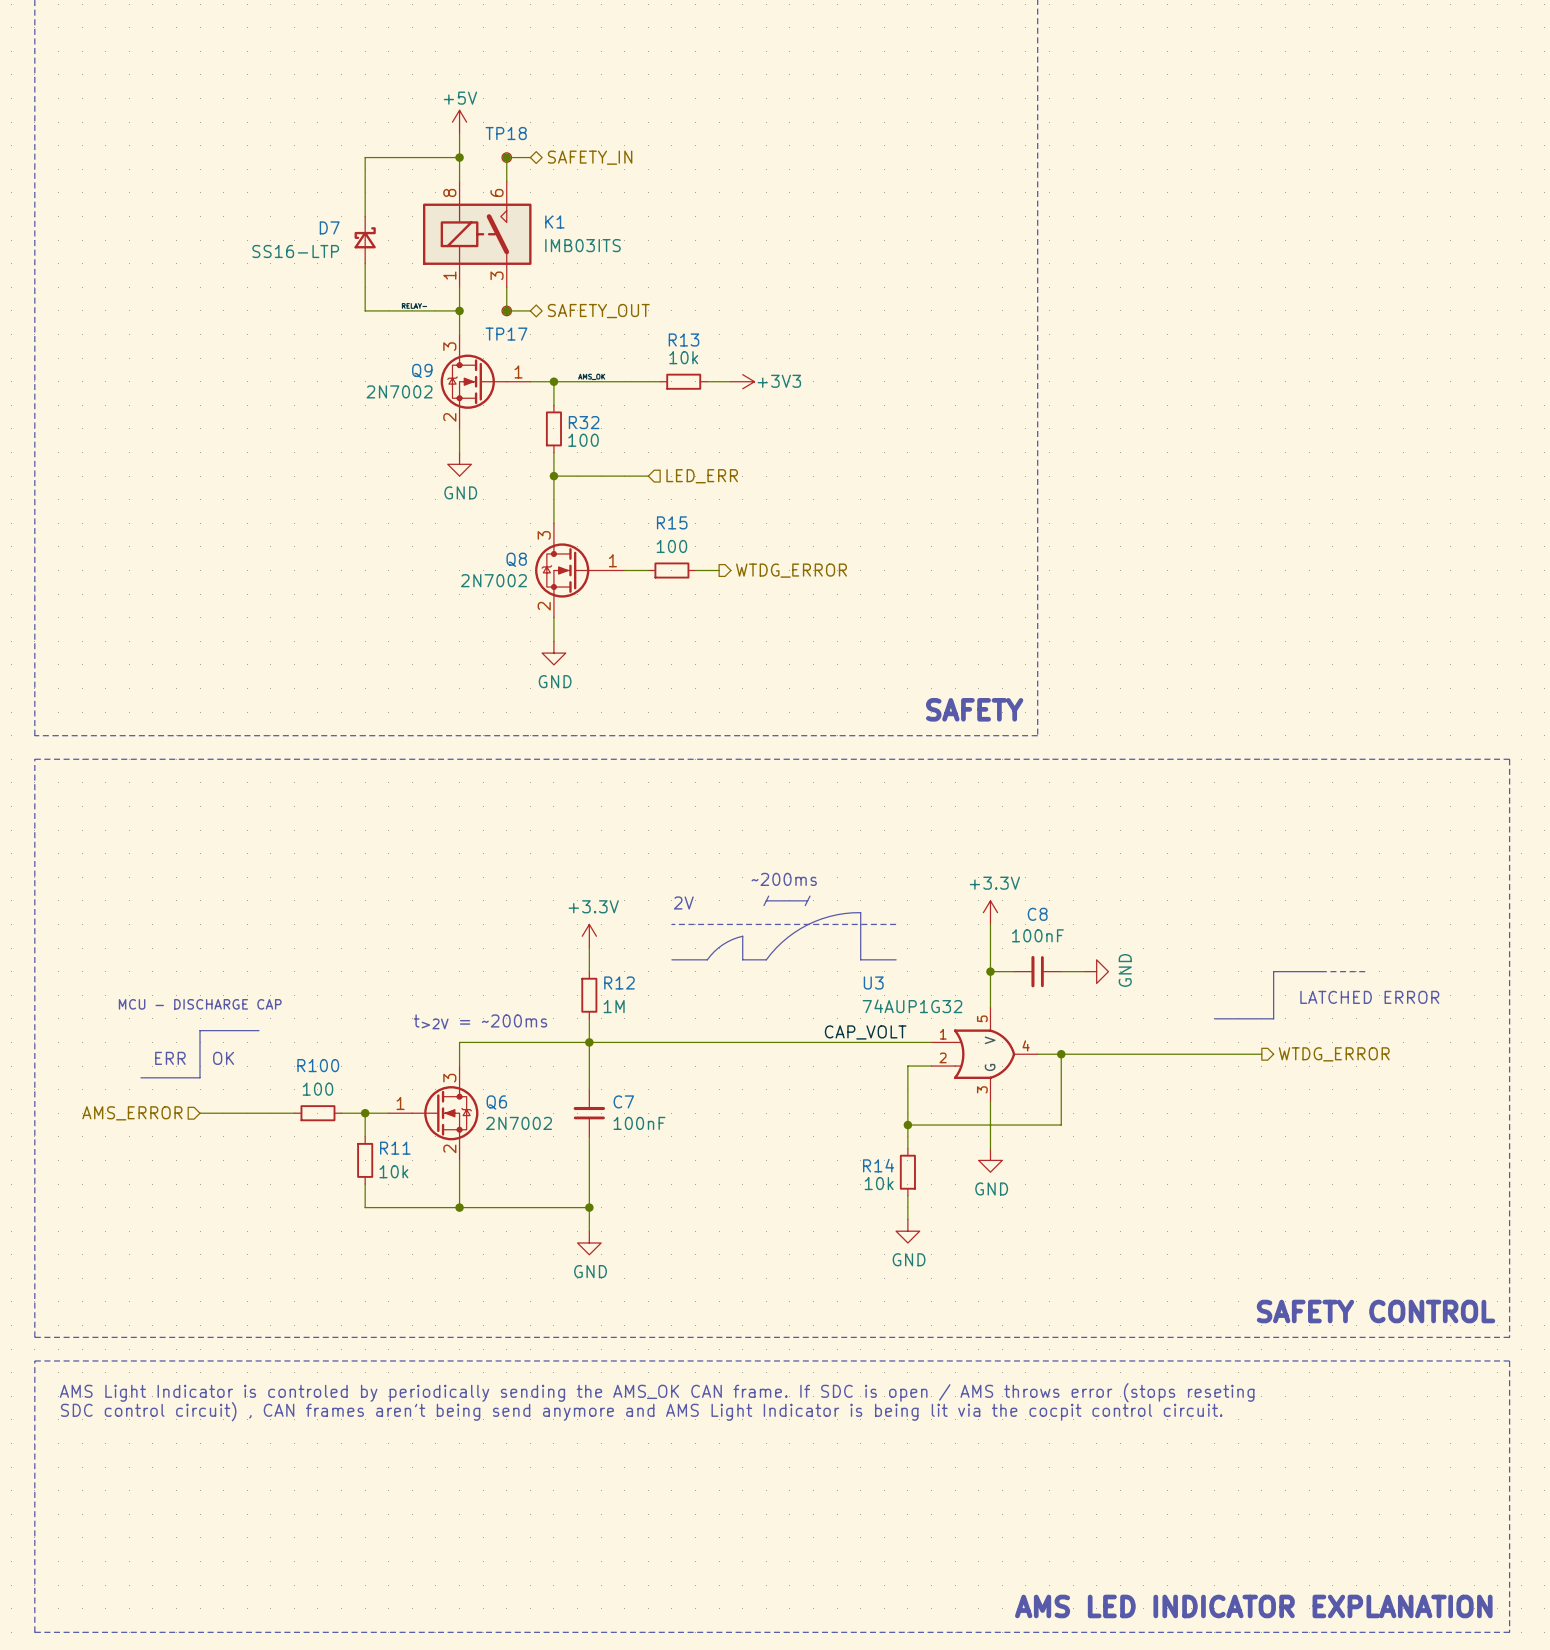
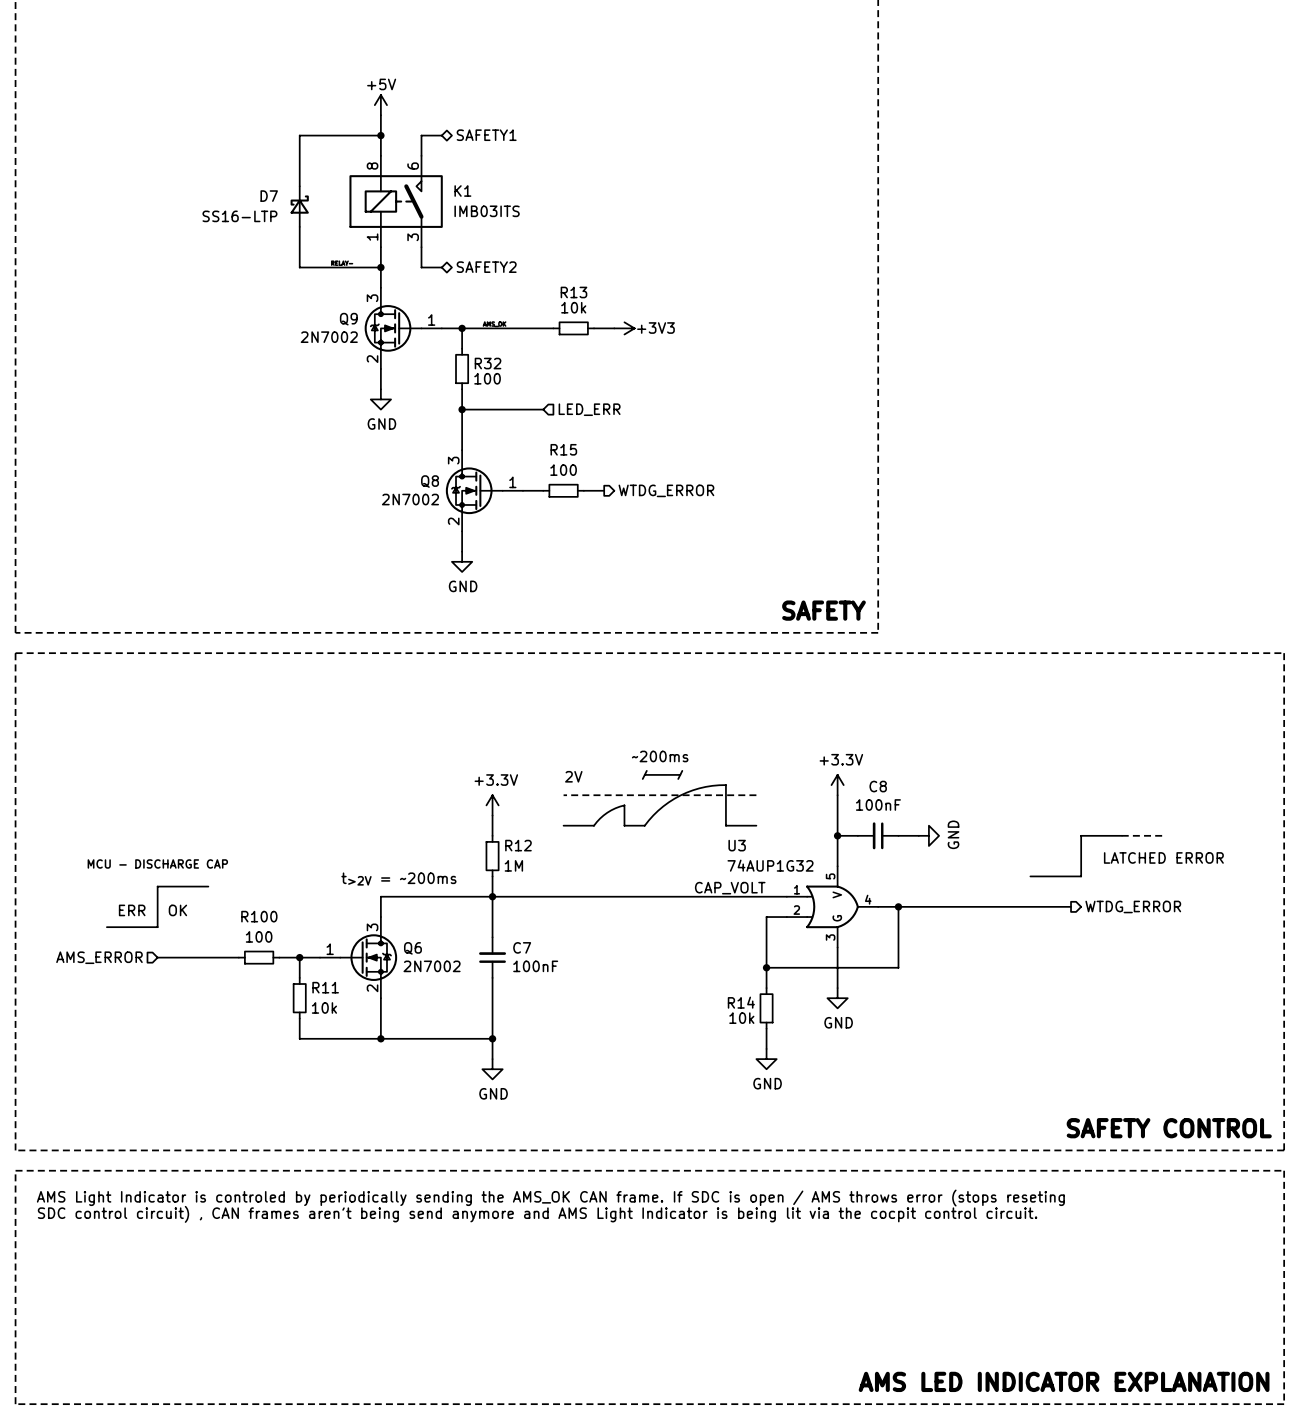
junction: (506, 157) -> none
TP18: (506, 157) -> none
hierarchical label: SAFETY_IN (590, 157) -> SAFETY1 (486, 135)
junction: (506, 310) -> none
TP17: (506, 310) -> none
hierarchical label: SAFETY_OUT (598, 311) -> SAFETY2 (486, 267)

